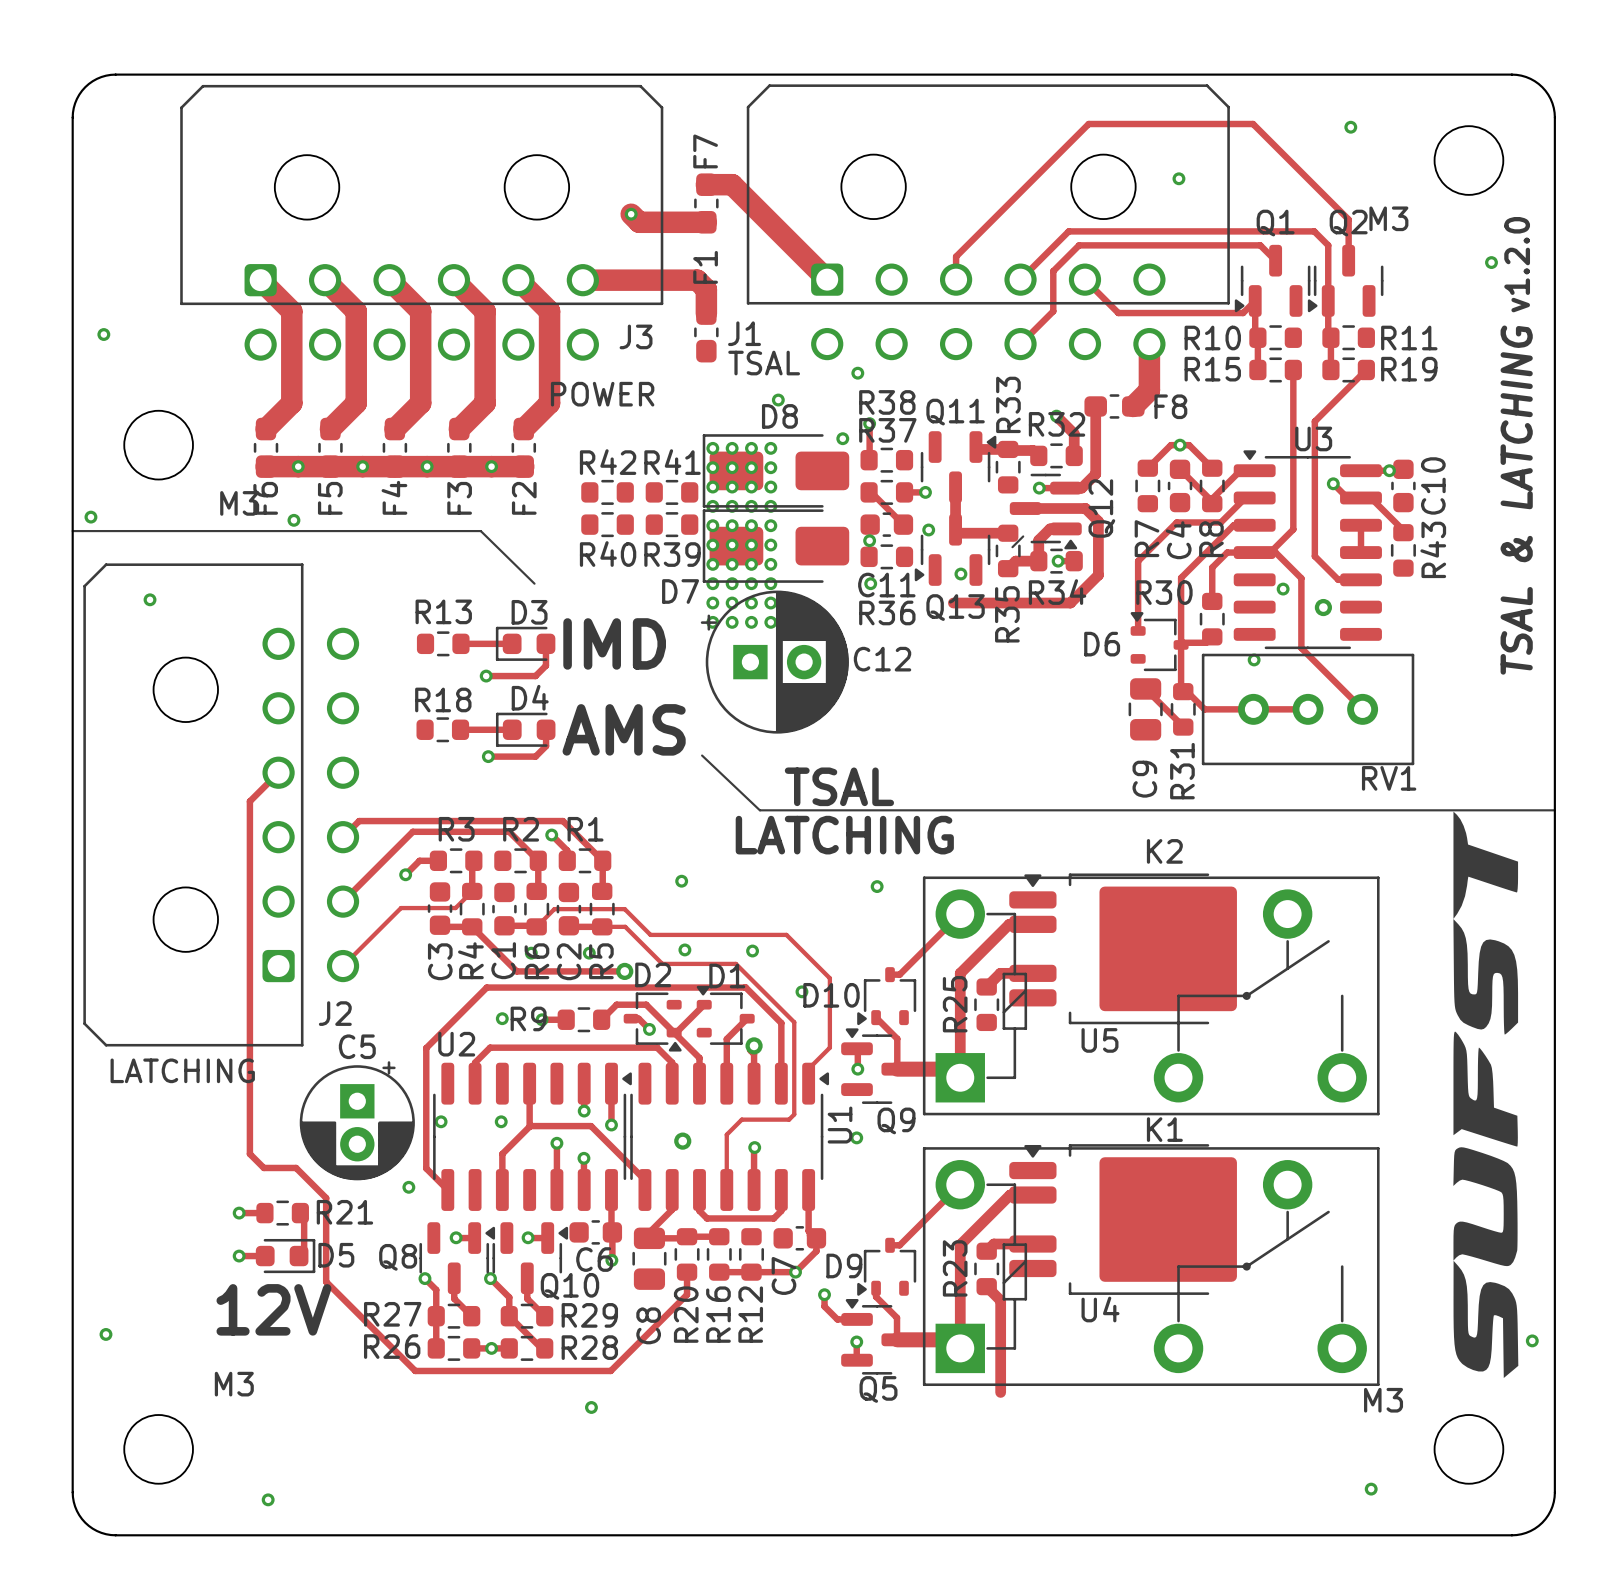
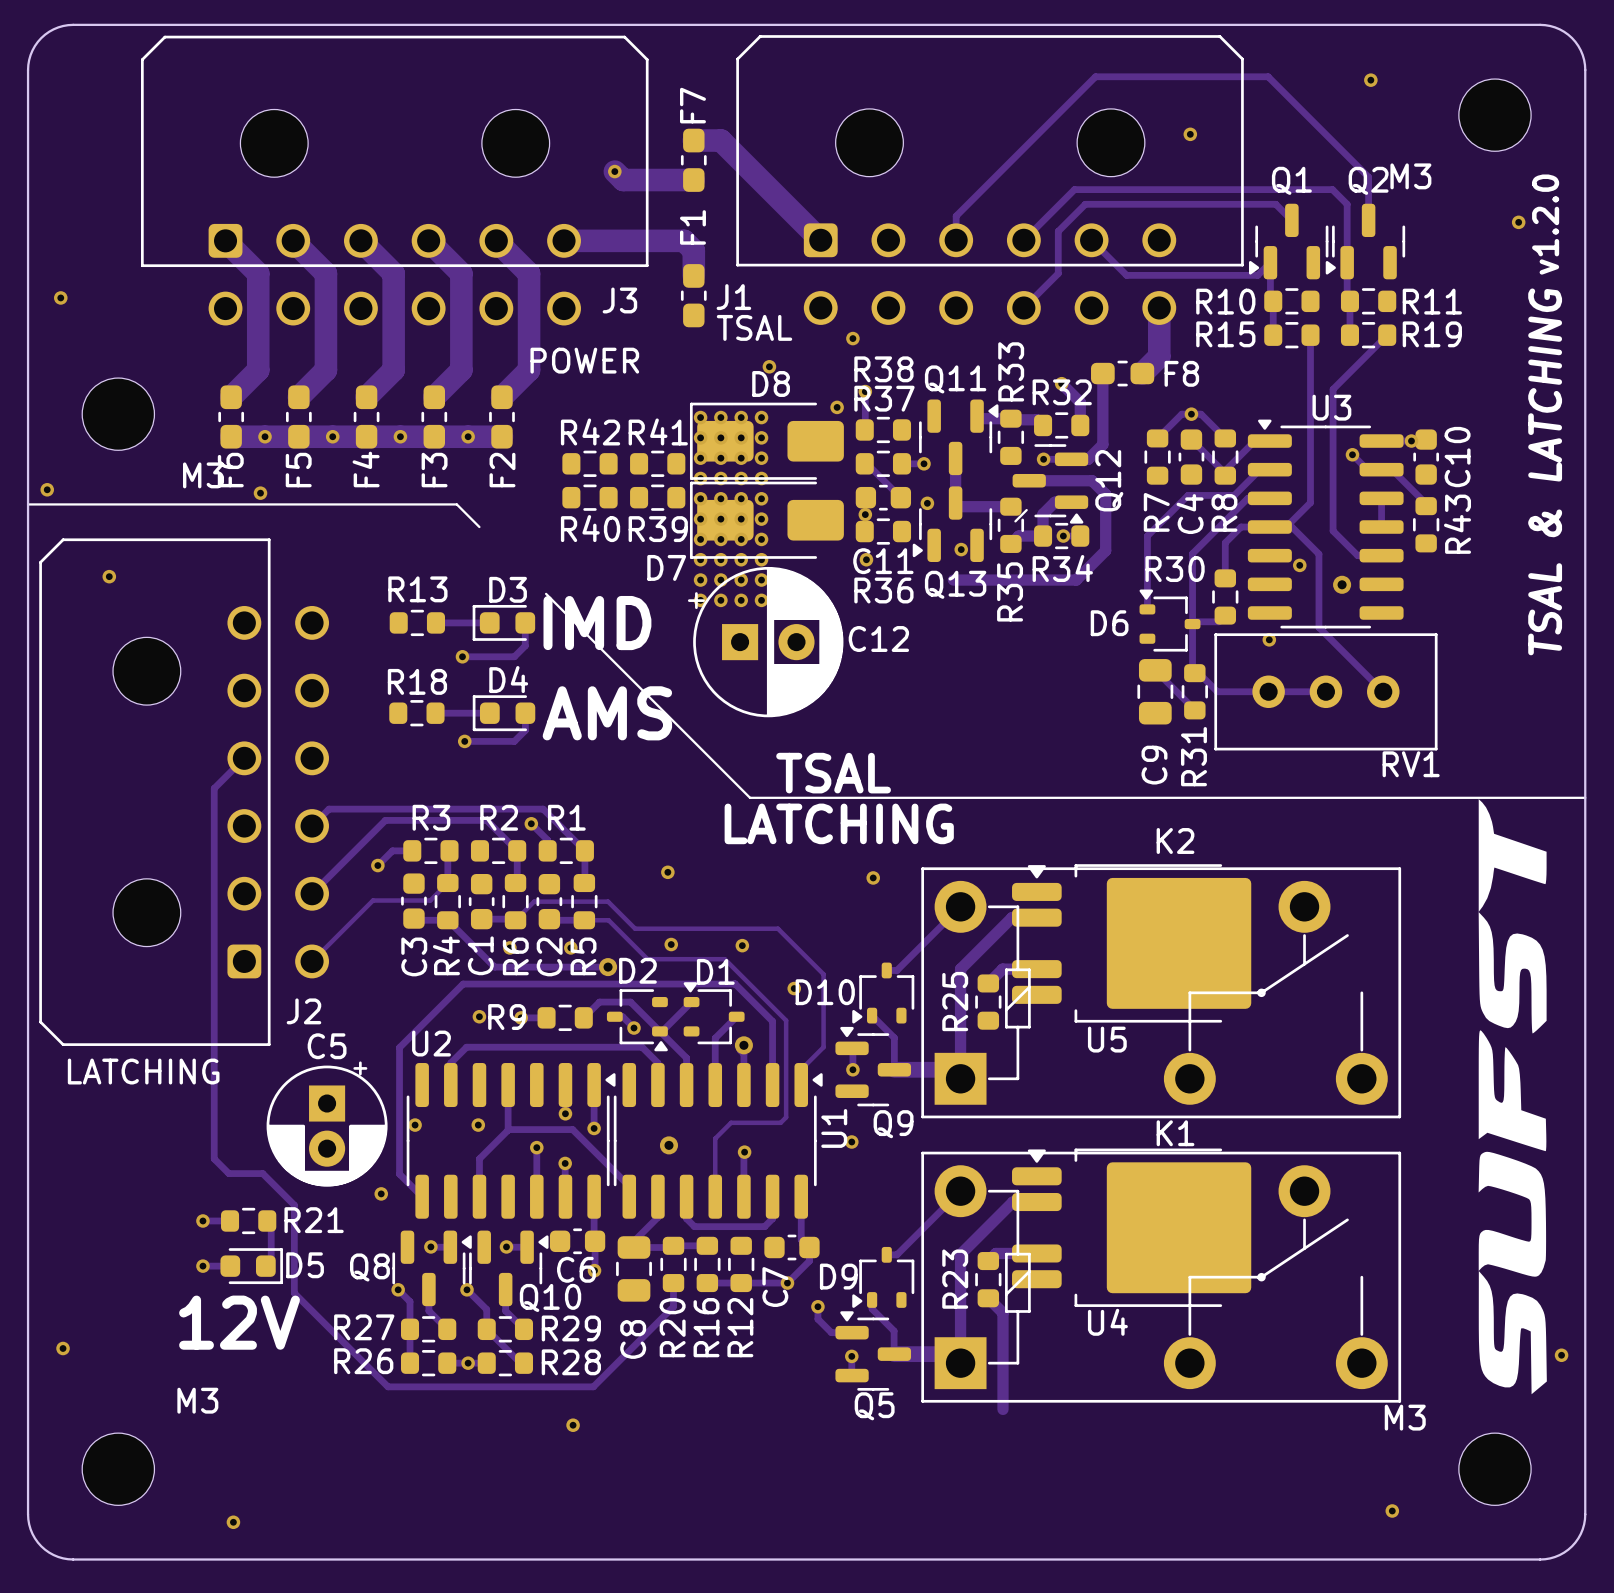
line: (480, 531) (534, 583) -> (457, 504) (479, 527)
line: (702, 755) (759, 810) -> (546, 593) (750, 797)

